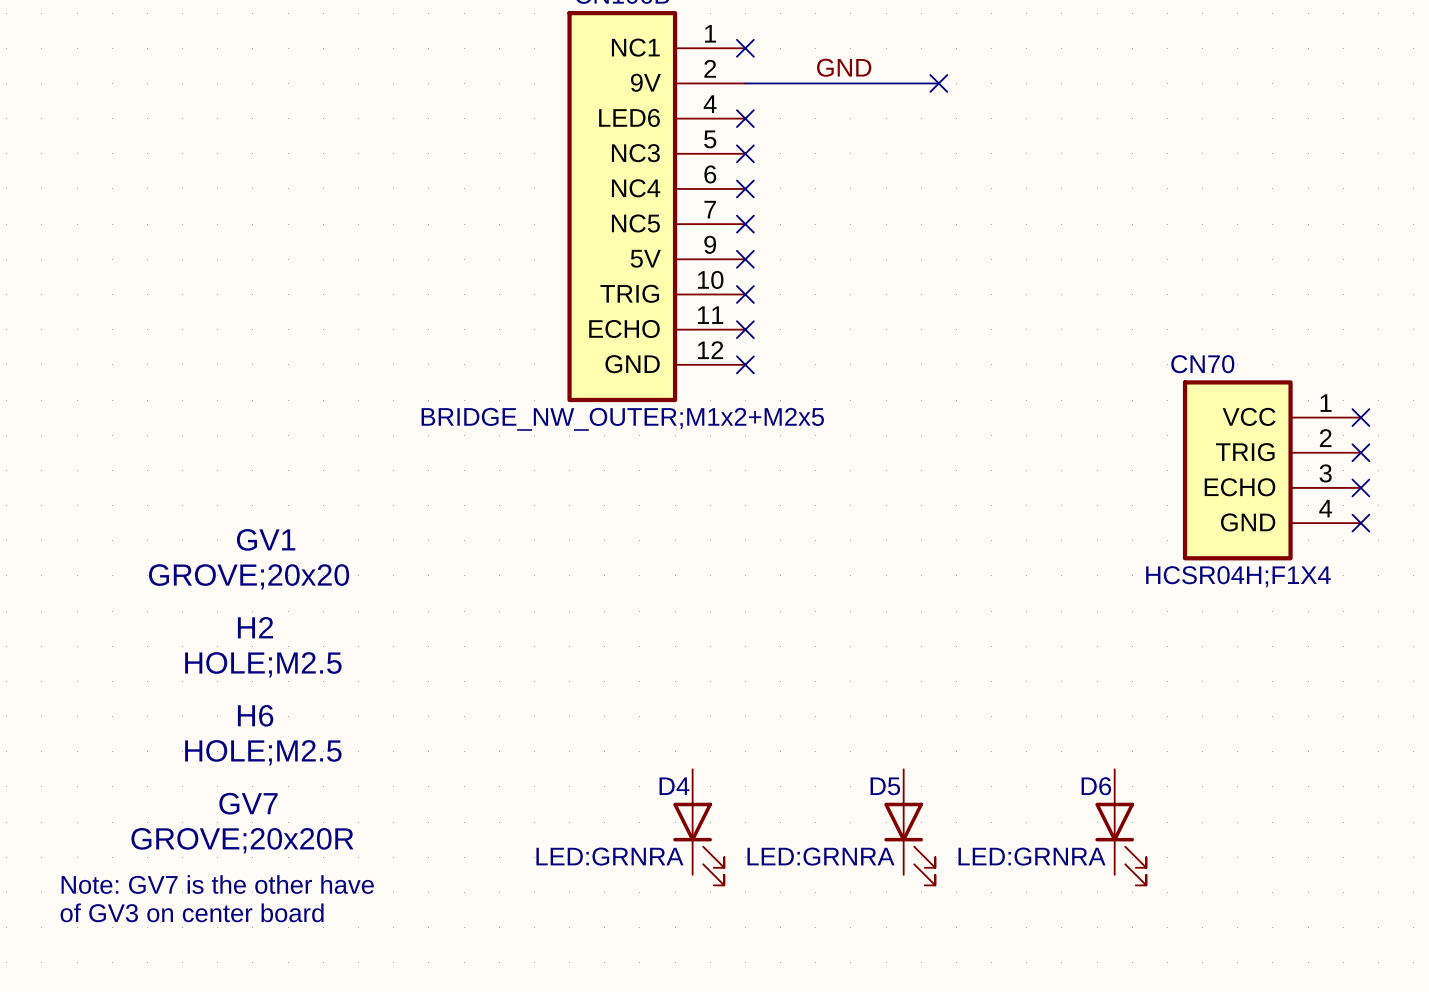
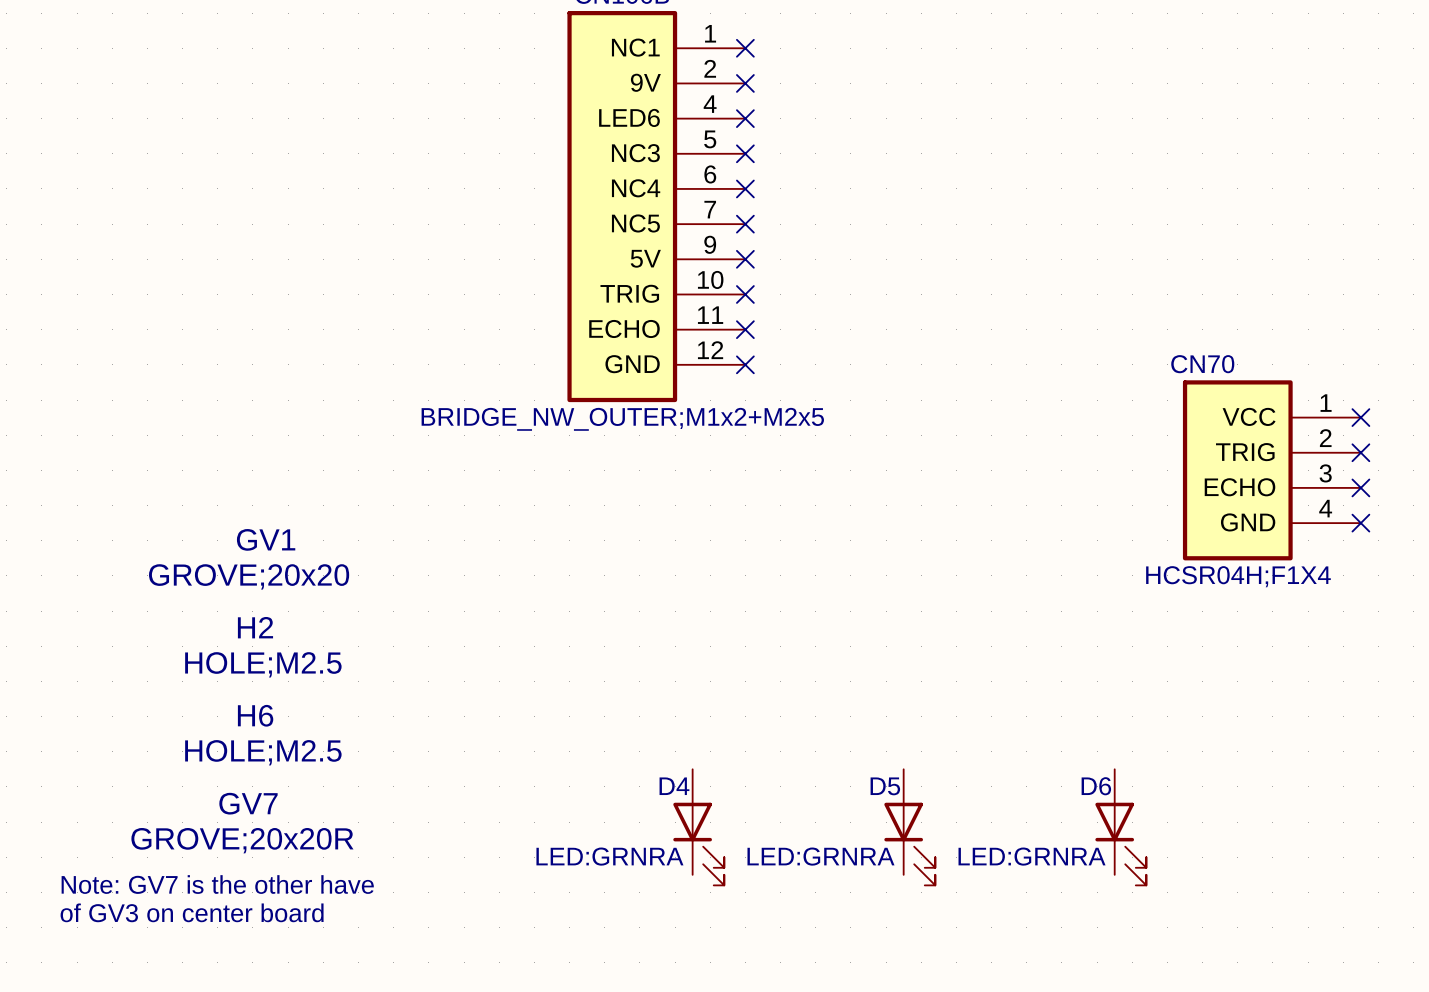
label: GND (844, 67) -> none
wire: (745, 83) (938, 83) -> none
no-connect mark: none -> (745, 83)
no-connect mark: (938, 83) -> none

